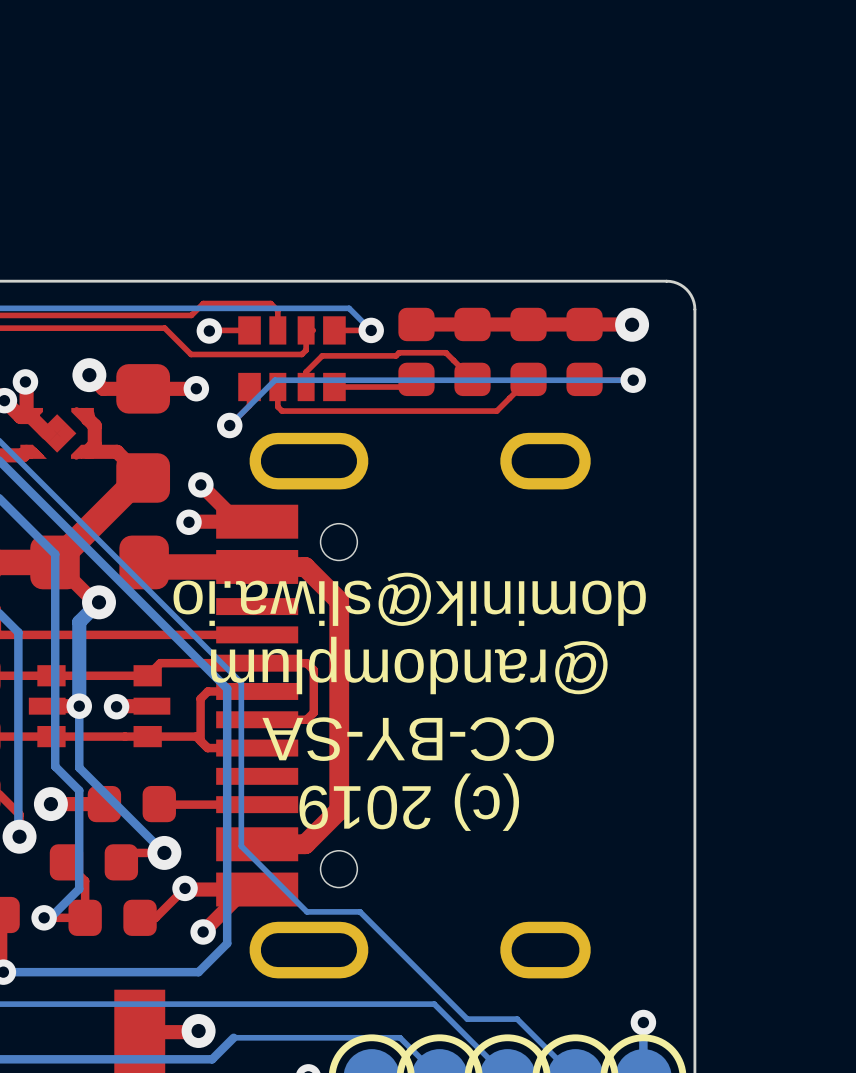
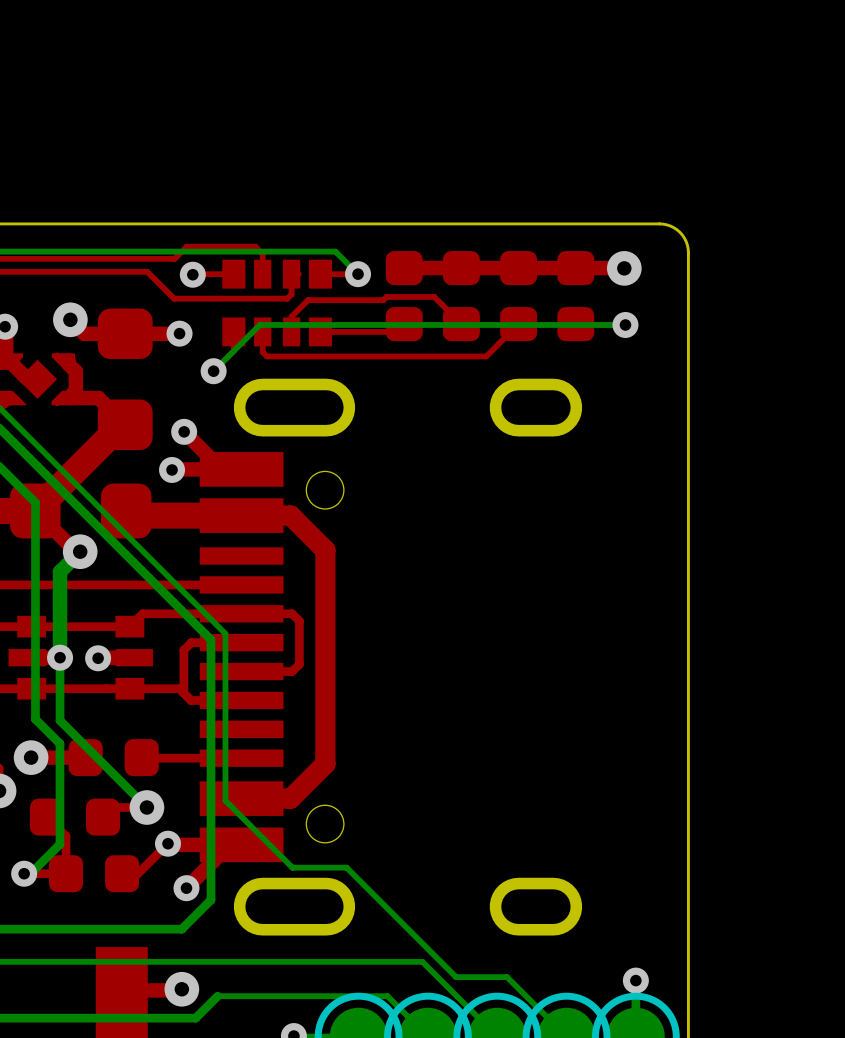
text: dominik@sliwa.io (409, 599) -> none
text: @randomplum (409, 665) -> none
text: CC-BY-SA (408, 739) -> none
text: (c) 2019 (409, 802) -> none

